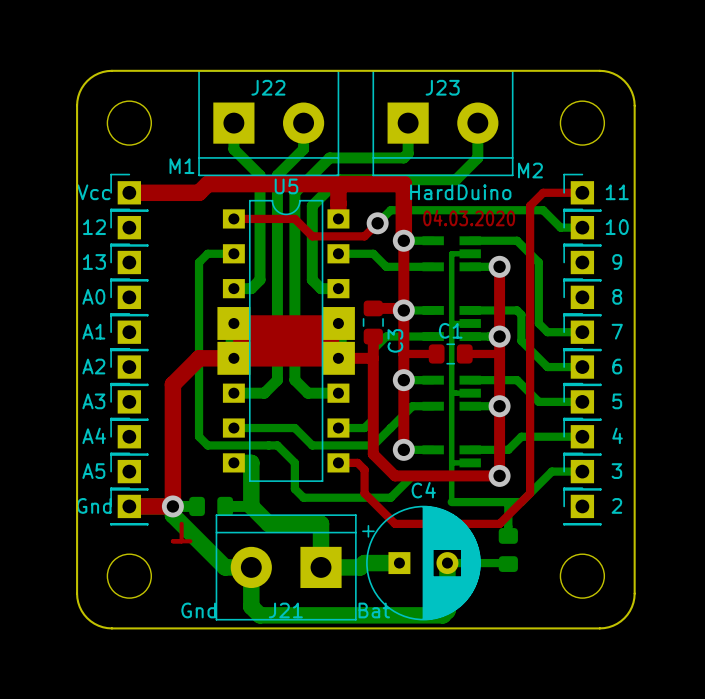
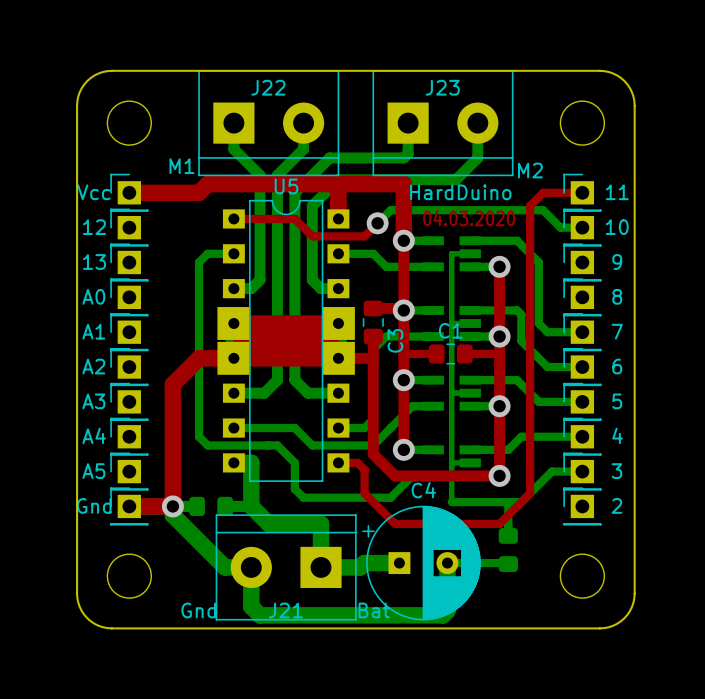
top track: (181, 523) (181, 541) -> none
top track: (172, 541) (190, 541) -> none

